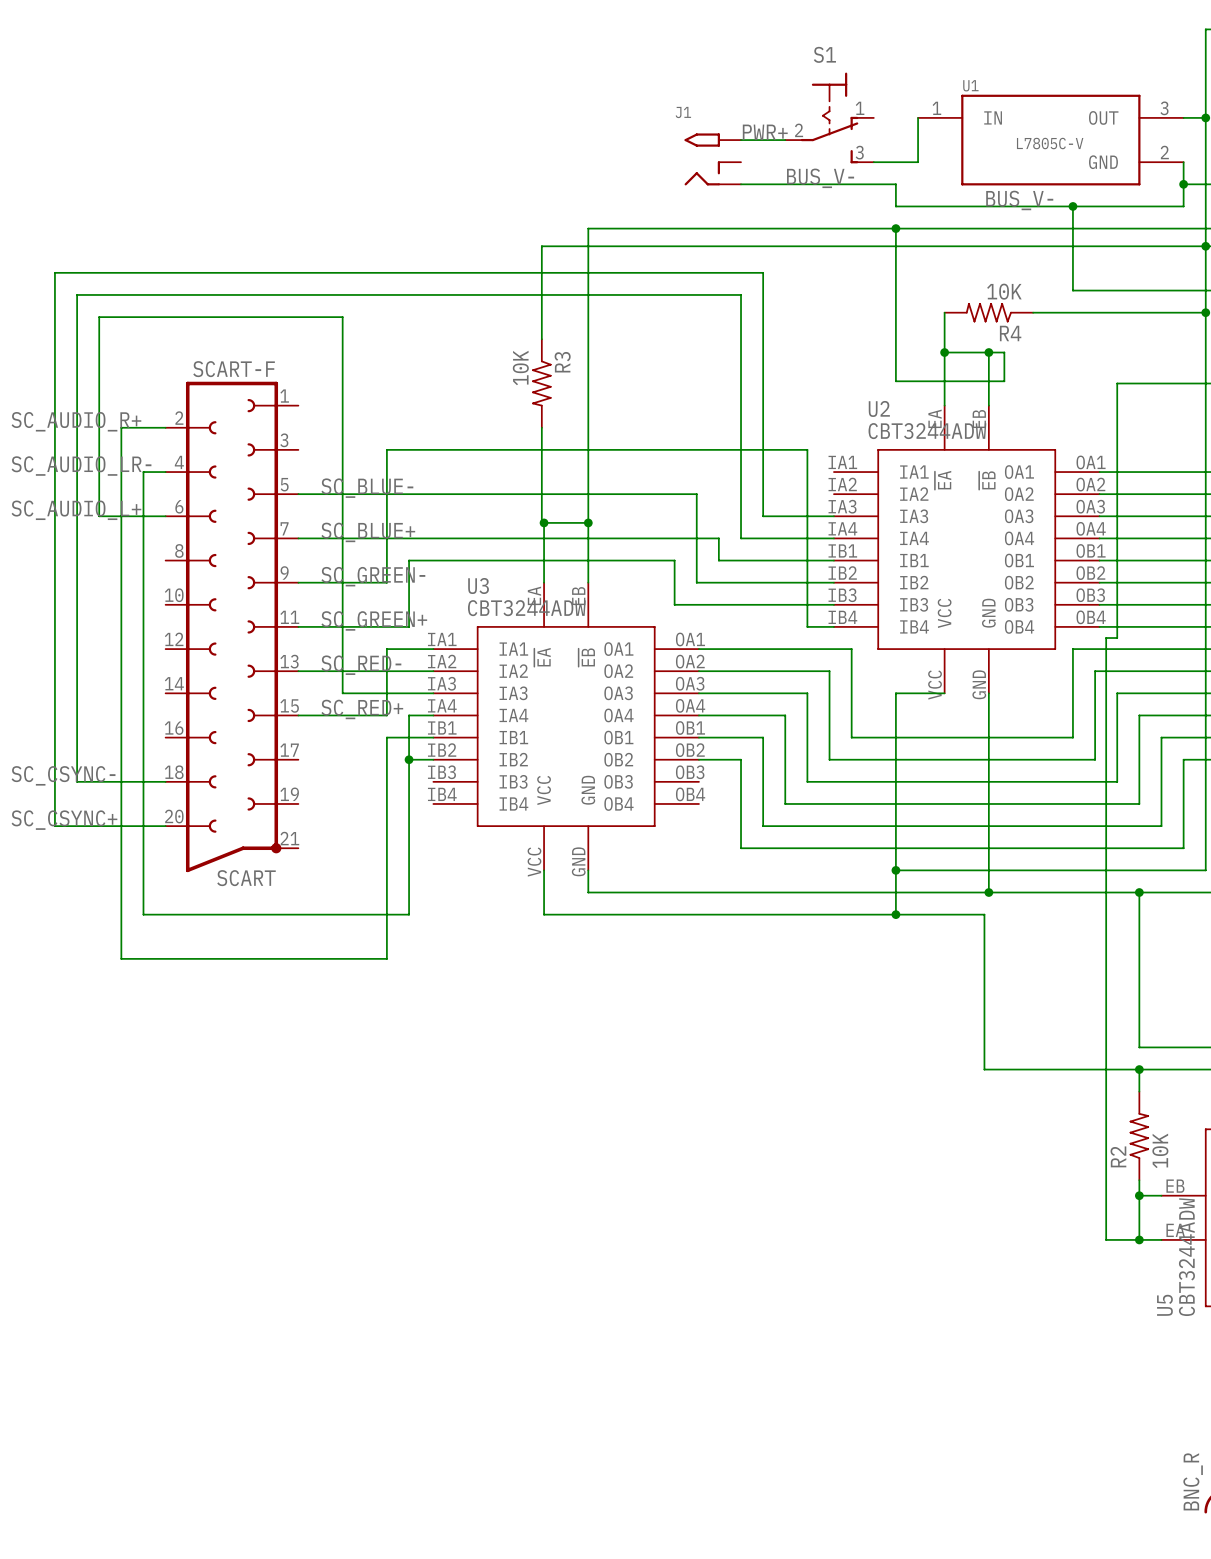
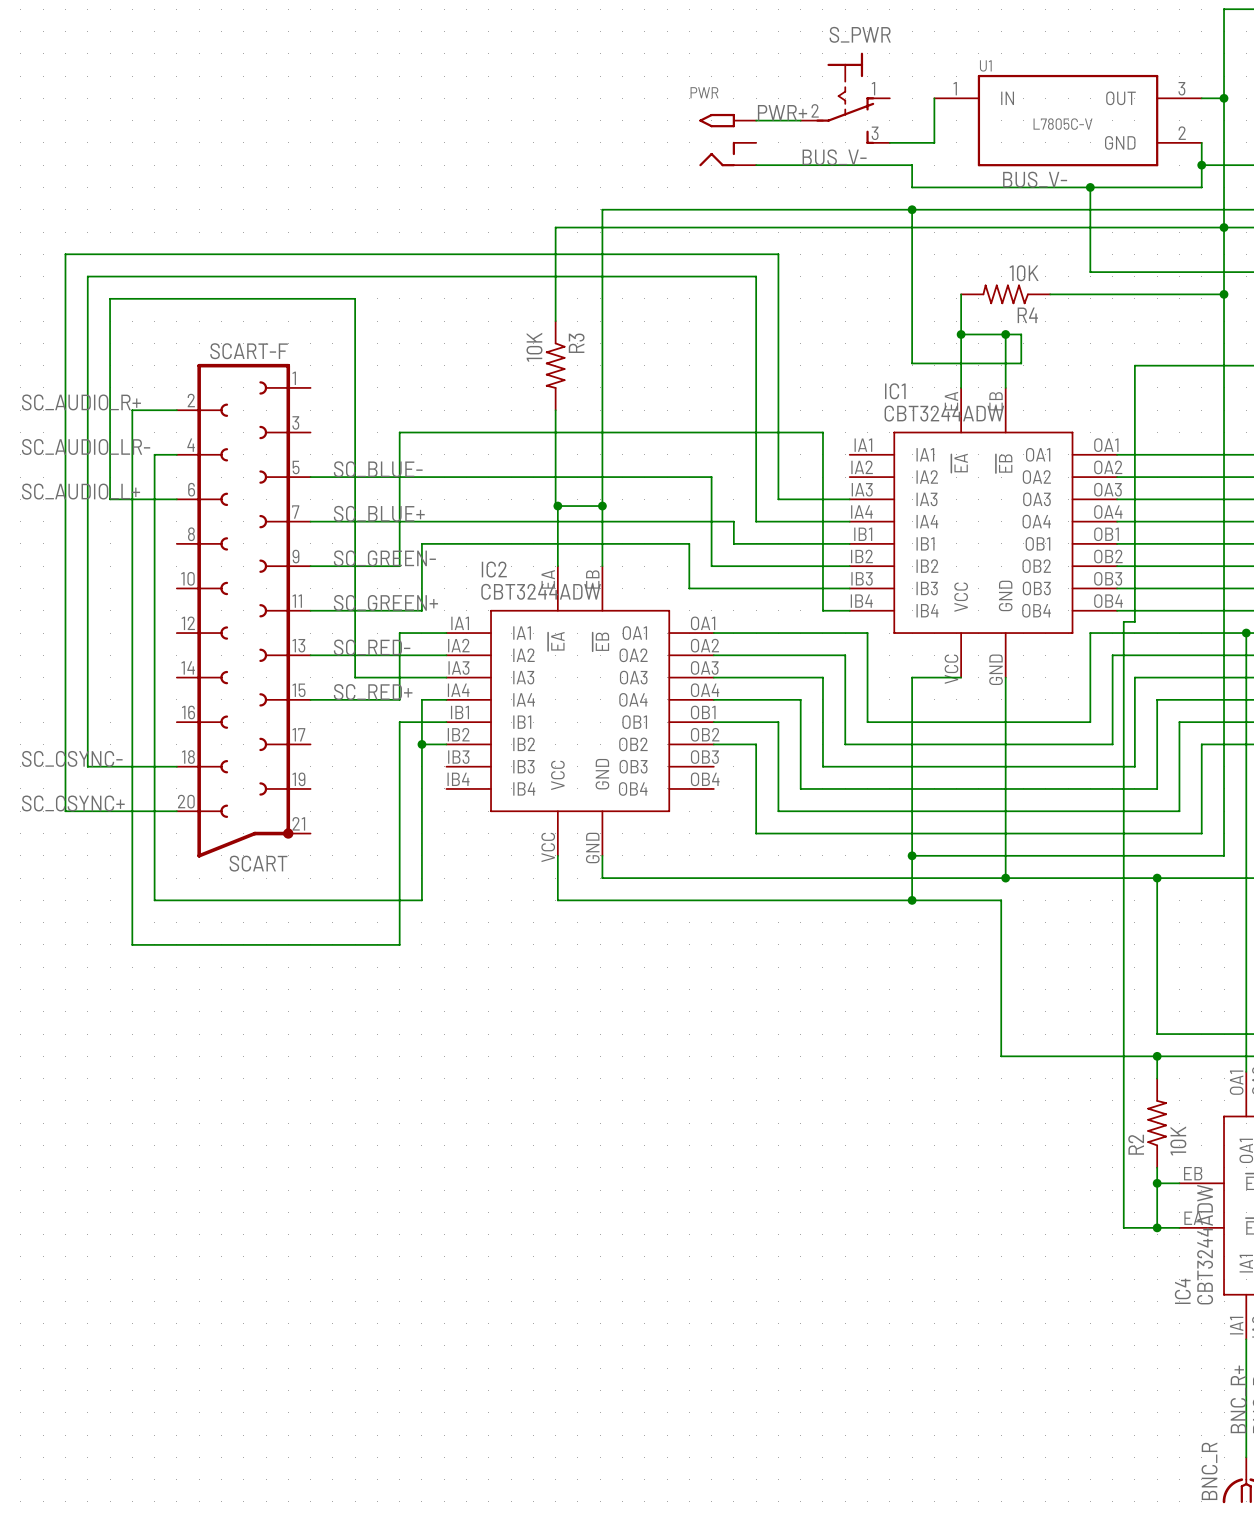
S1 name: S1 (824, 54) -> S_PWR (860, 34)
J1 name: J1 (683, 112) -> PWR (704, 92)
U2 name: U2 (879, 408) -> IC1 (895, 391)
U3 name: U3 (478, 586) -> IC2 (494, 569)
U5 name: U5 (1164, 1305) -> IC4 (1182, 1291)

